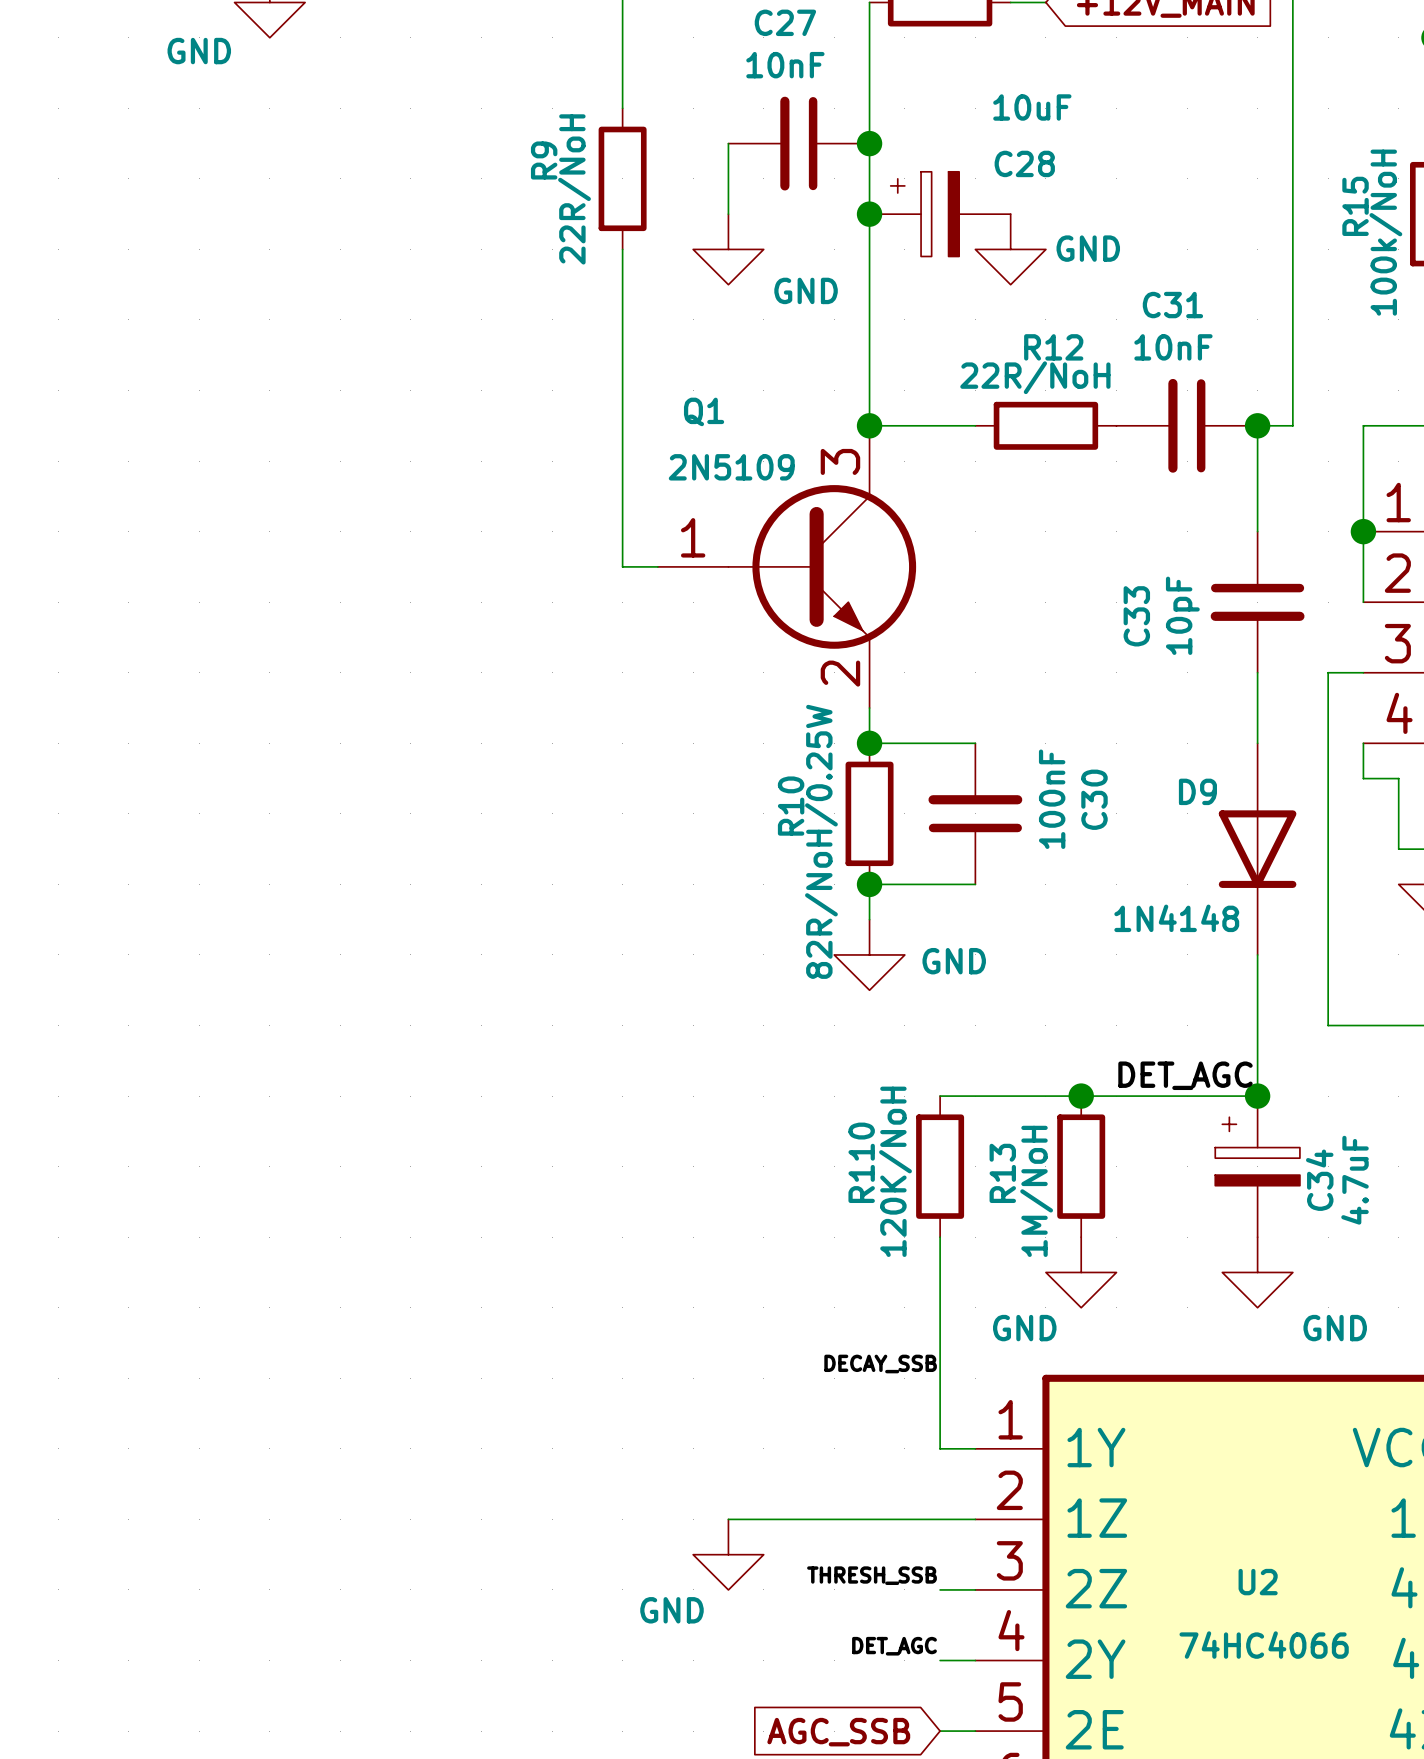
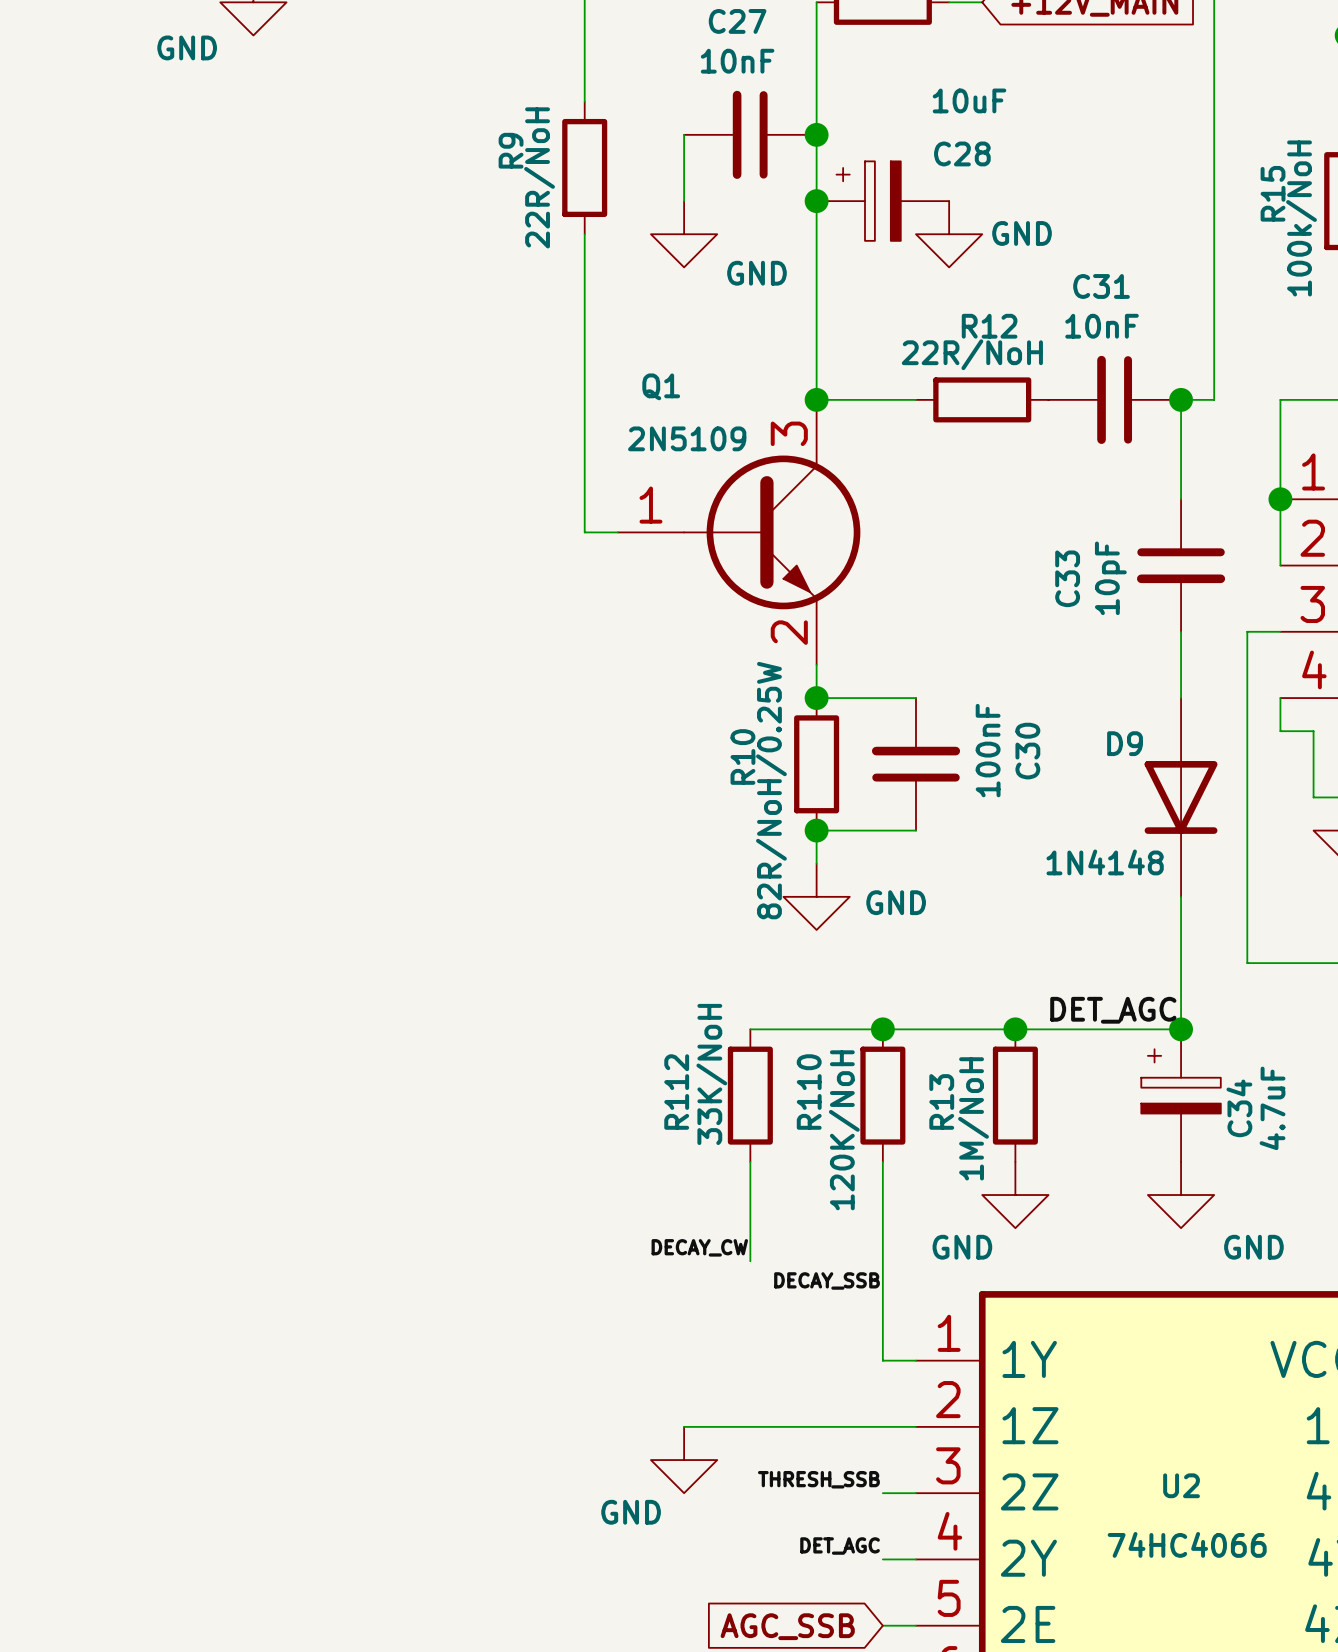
wire: none -> (750, 1029) (882, 1029)
junction: none -> (882, 1029)
R112: none -> 33K/NoH (750, 1095)
R110 value position: 120K/NoH (895, 1171) -> 120K/NoH (844, 1130)
wire: none -> (750, 1161) (750, 1261)
label: none -> DECAY_CW (699, 1247)

